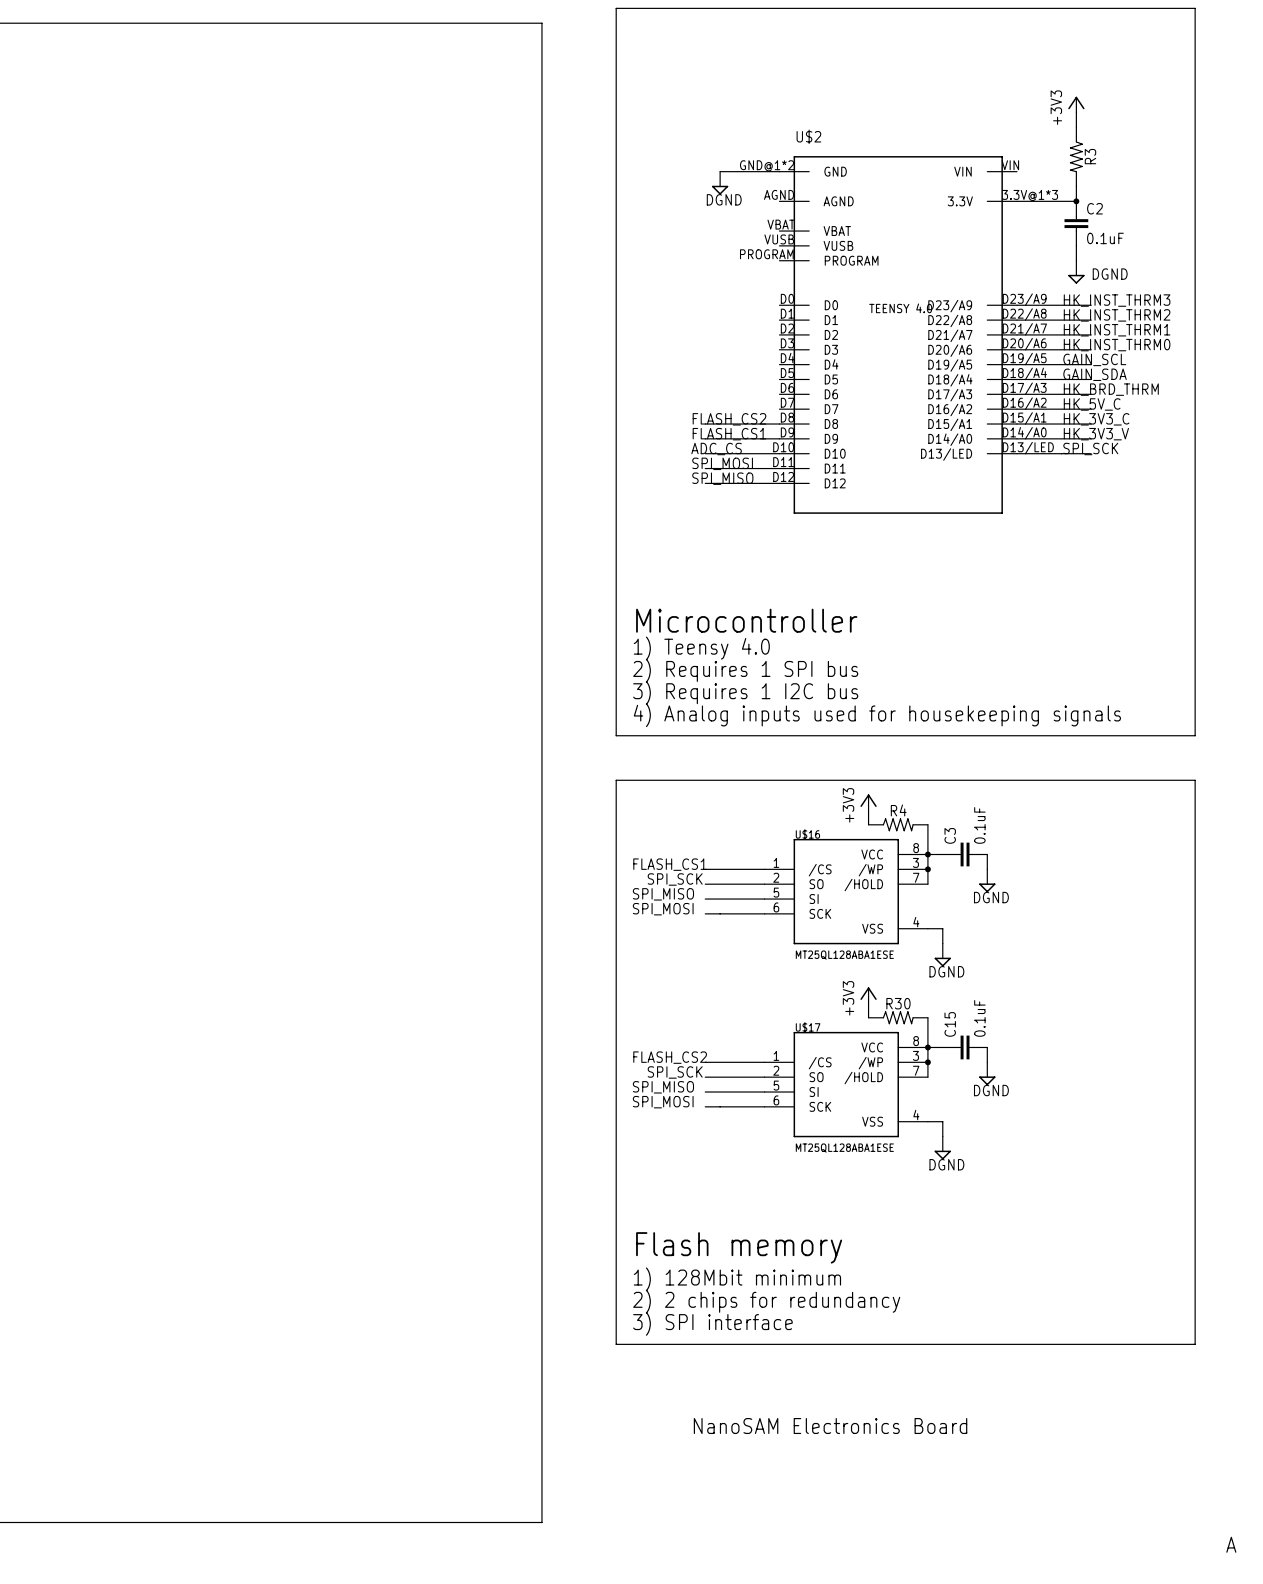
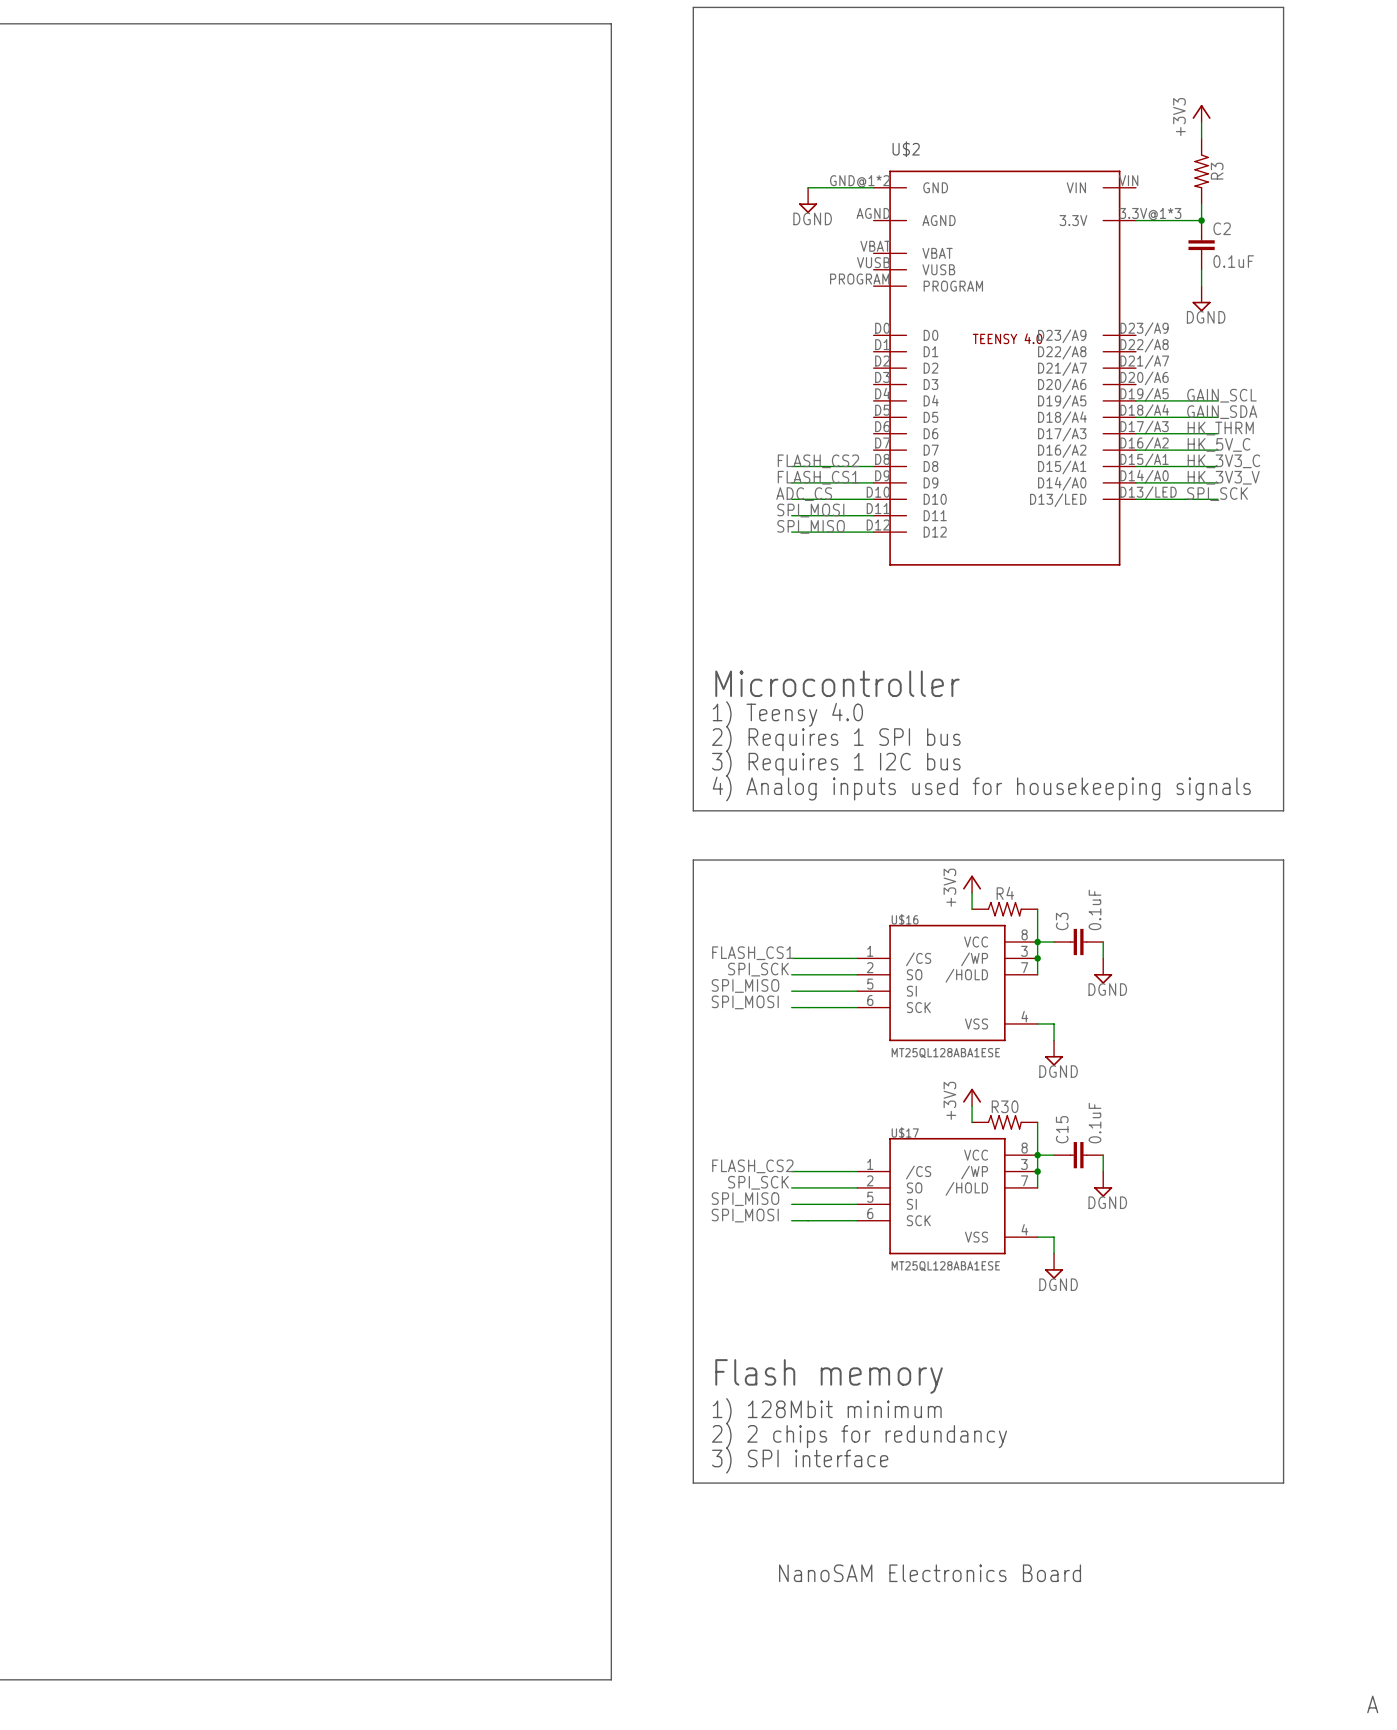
line: (1150, 8) (1195, 8) (1195, 735) (1150, 735) -> (1283, 7) (1283, 810)
power symbol text position: DGND (1110, 274) -> DGND (1206, 317)
label: HK_INST_THRM3 (1117, 300) -> none
wire: (1017, 305) (1091, 305) -> none
label: HK_INST_THRM2 (1117, 315) -> none
wire: (1017, 320) (1091, 320) -> none
label: HK_INST_THRM1 (1117, 330) -> none
wire: (1017, 334) (1091, 334) -> none
label: HK_INST_THRM0 (1117, 345) -> none
wire: (1017, 349) (1091, 349) -> none
label: HK_BRD_THRM (1111, 389) -> HK_THRM (1220, 428)
line: (1150, 780) (1195, 780) (1195, 1344) (1150, 1344) -> (1283, 860) (1283, 1483)

